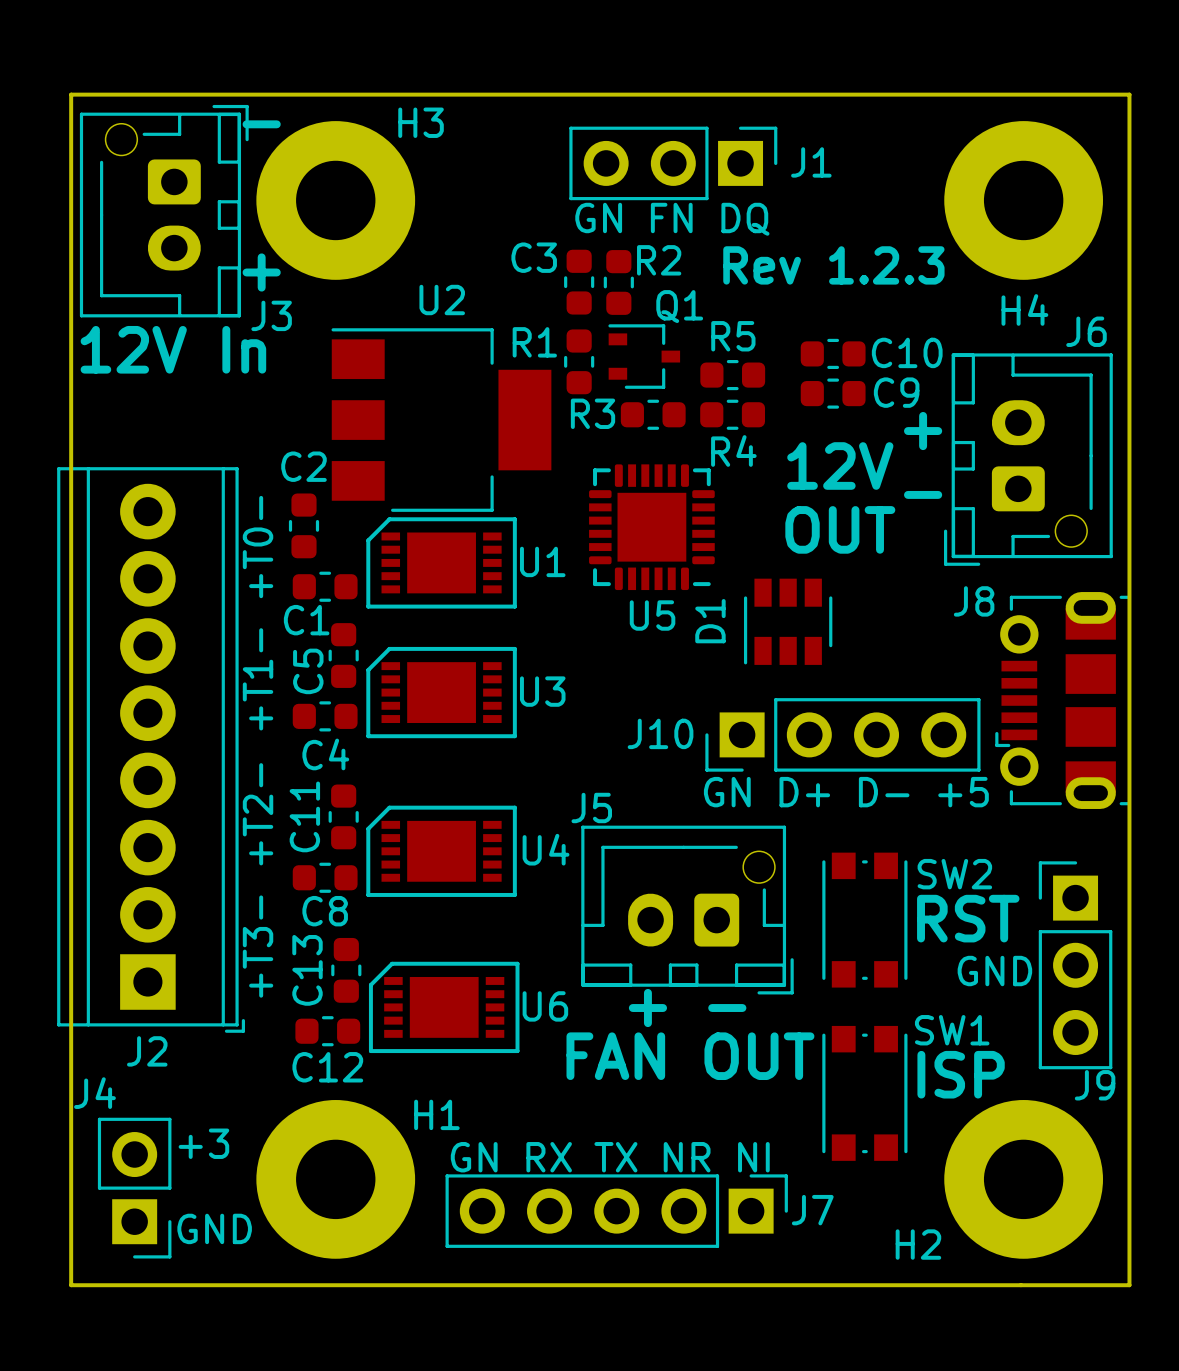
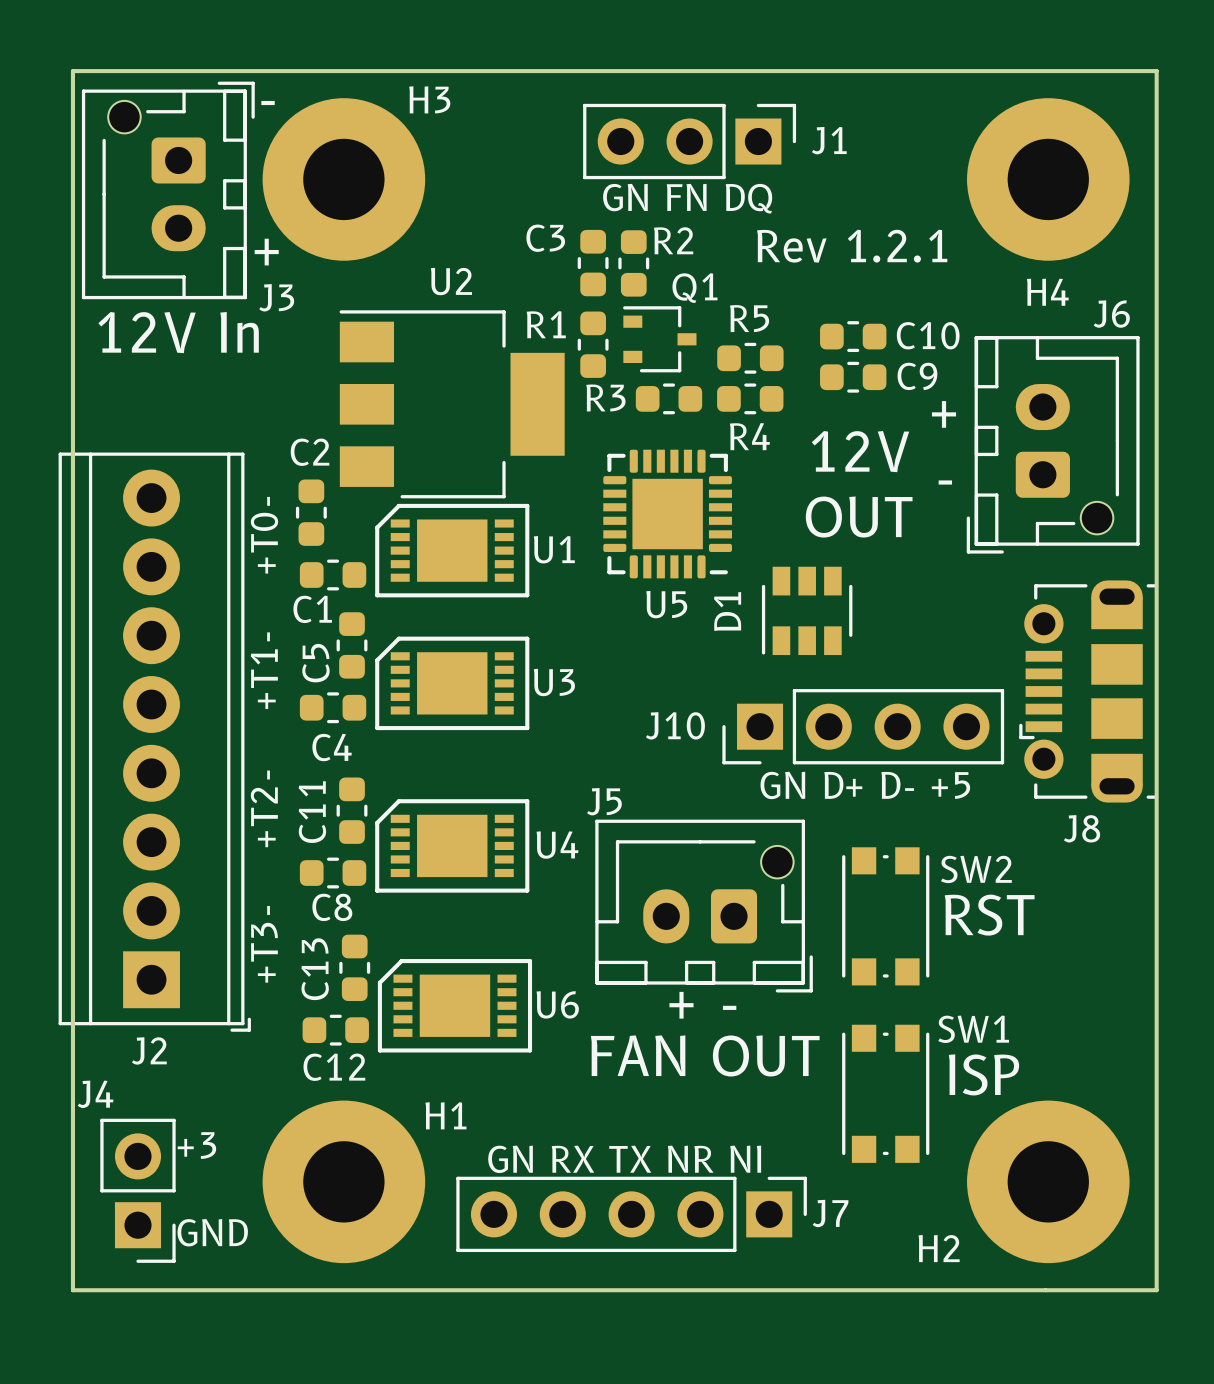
text: Rev 1.2.3 (833, 265) -> Rev 1.2.1 (852, 246)
J8 name position: J8 (974, 601) -> J8 (1082, 828)
J9: (1075, 965) -> none
text: GND (994, 971) -> none

